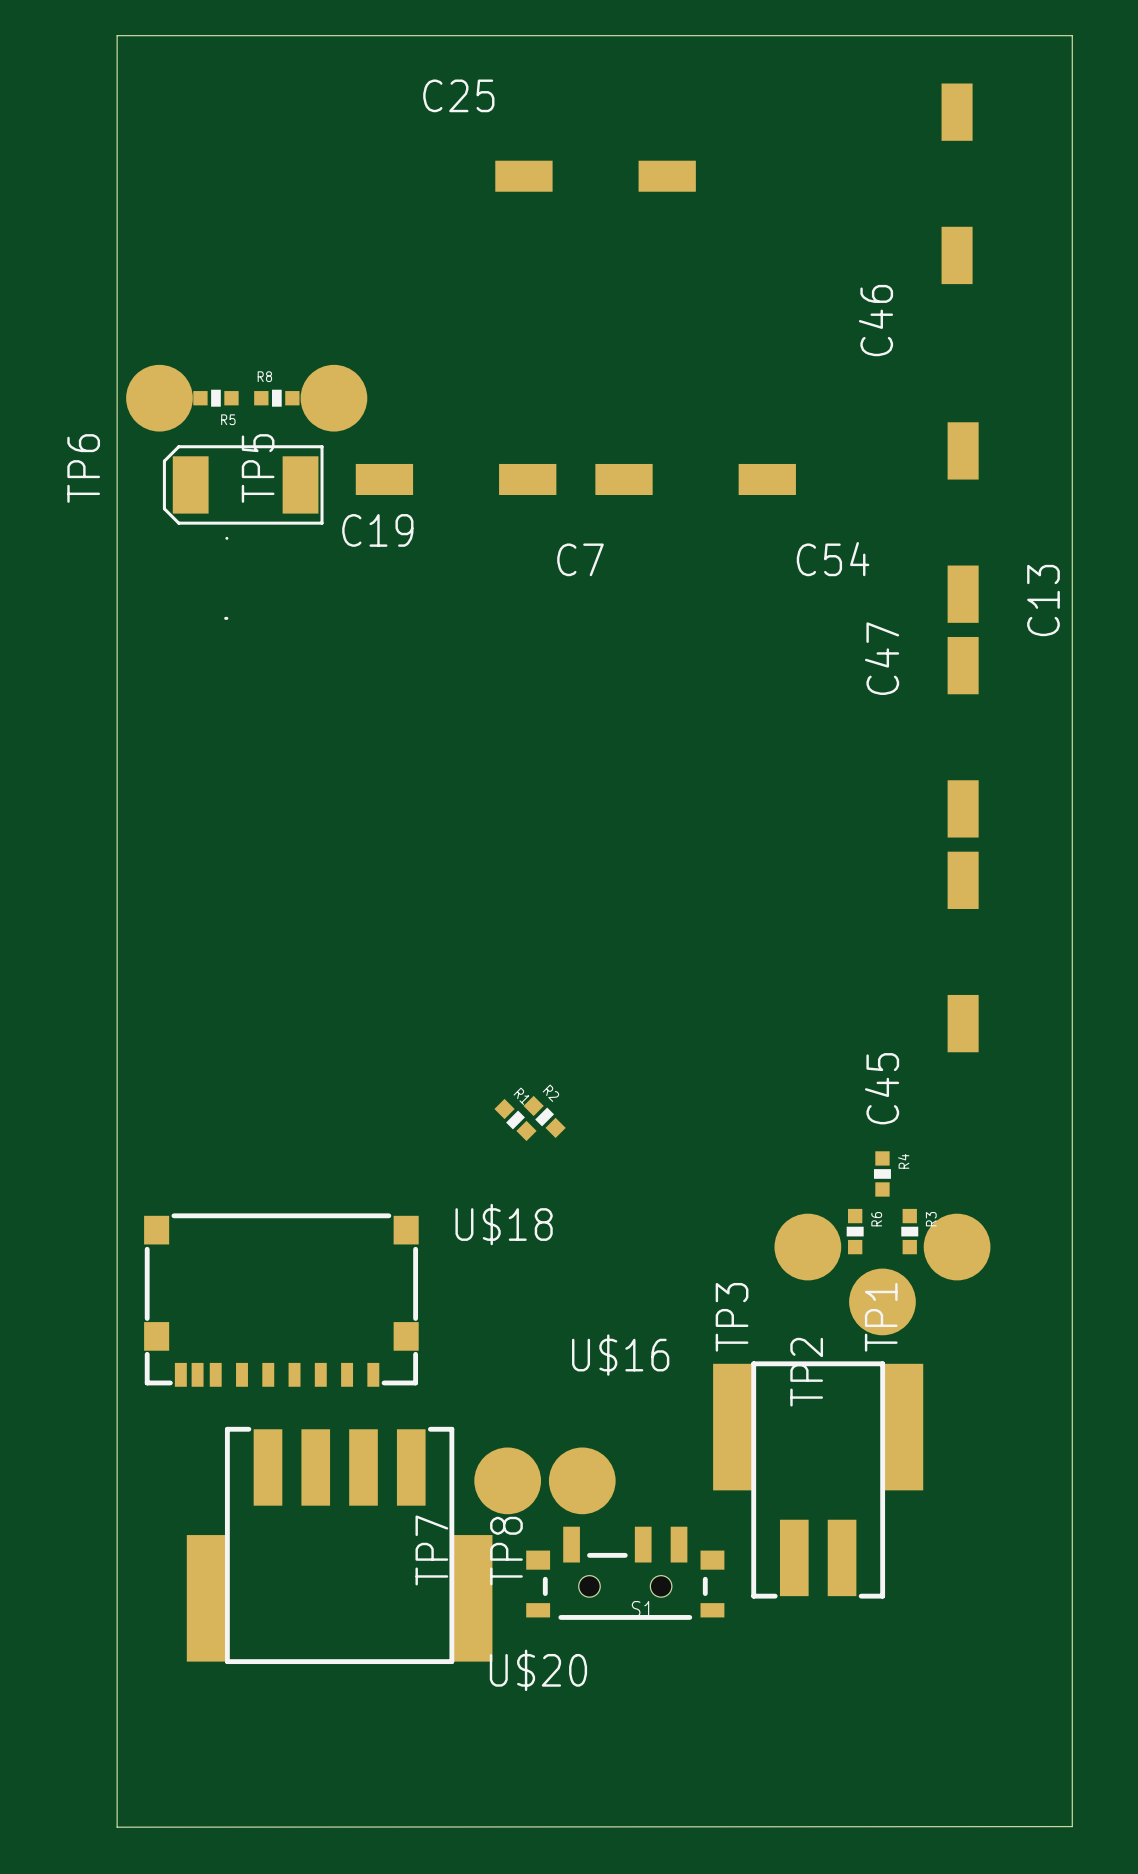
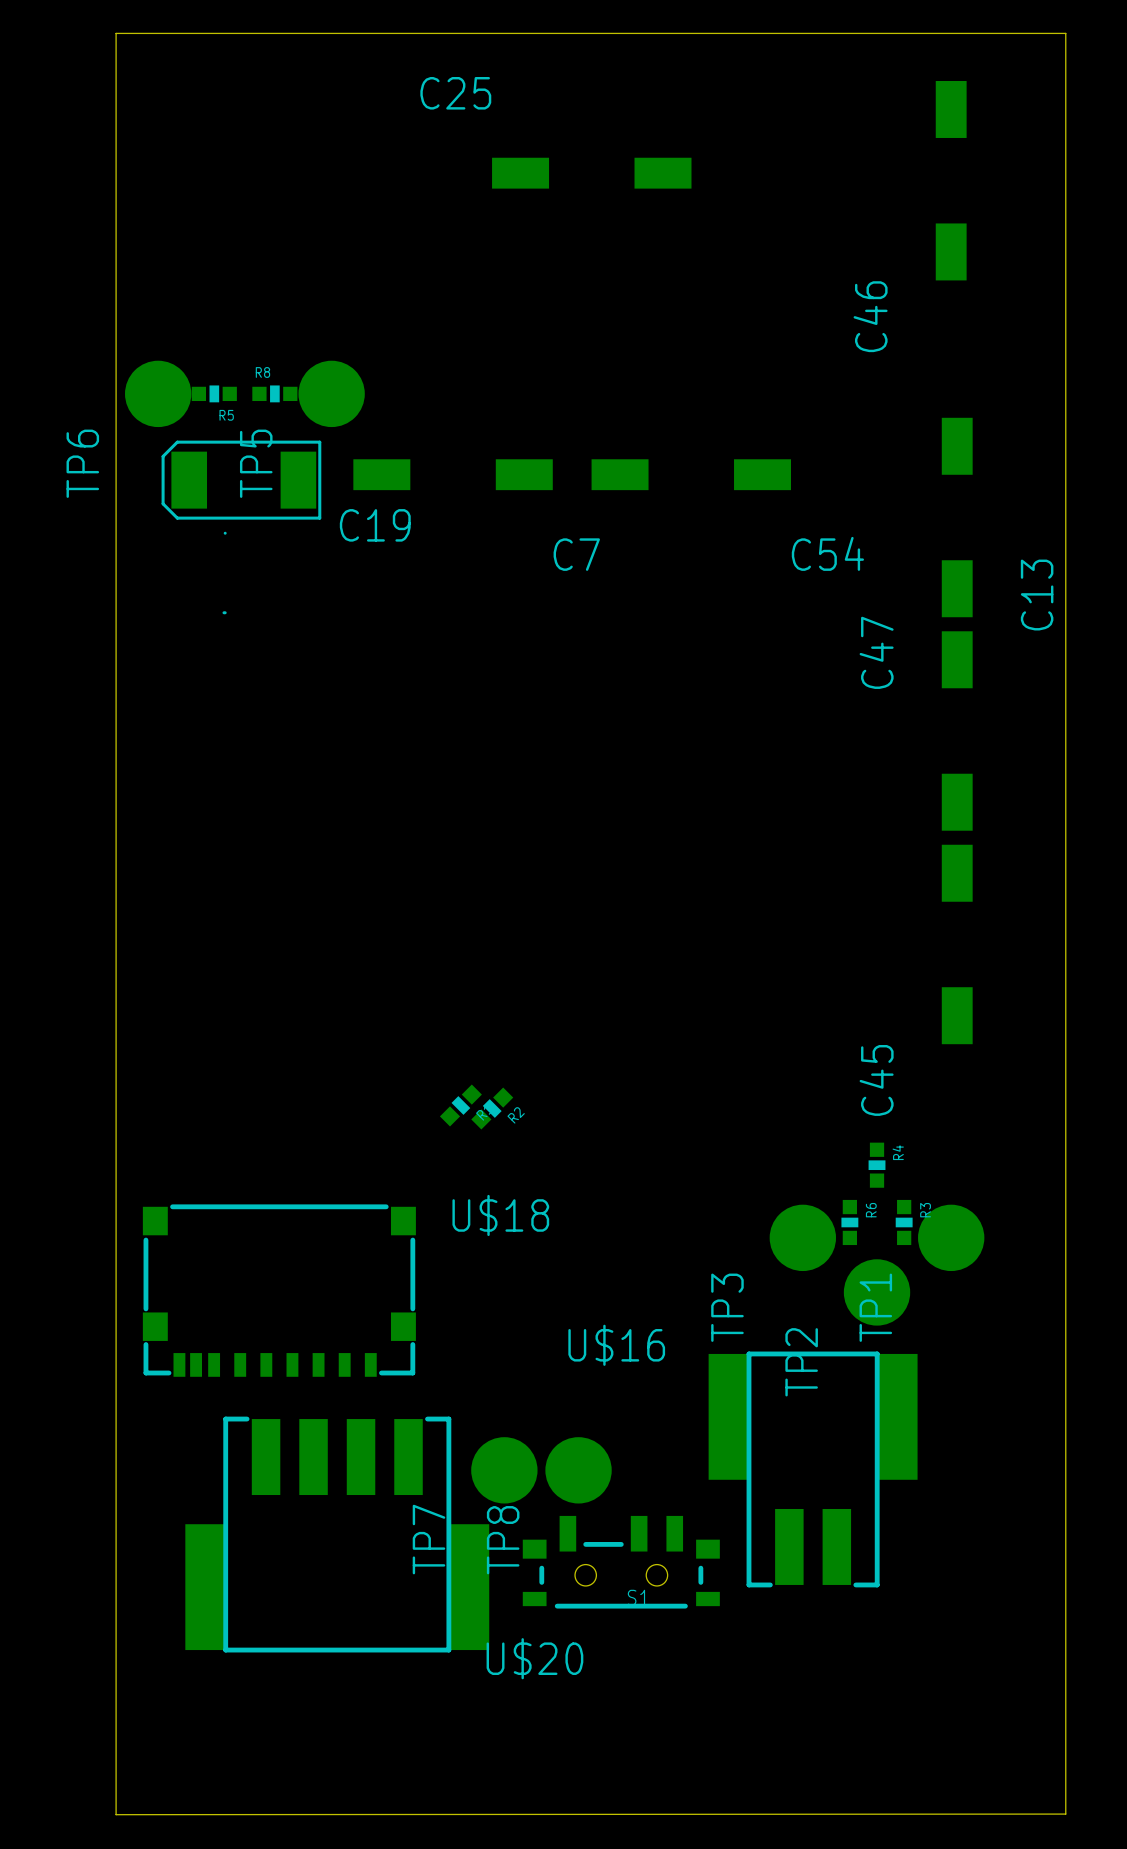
R2 rotation: 0° (544, 1116) -> 90° clockwise (492, 1108)
R2 position: (544, 1116) -> (492, 1108)
R1 rotation: 0° (515, 1119) -> 90° clockwise (460, 1105)
R1 position: (515, 1119) -> (460, 1105)

